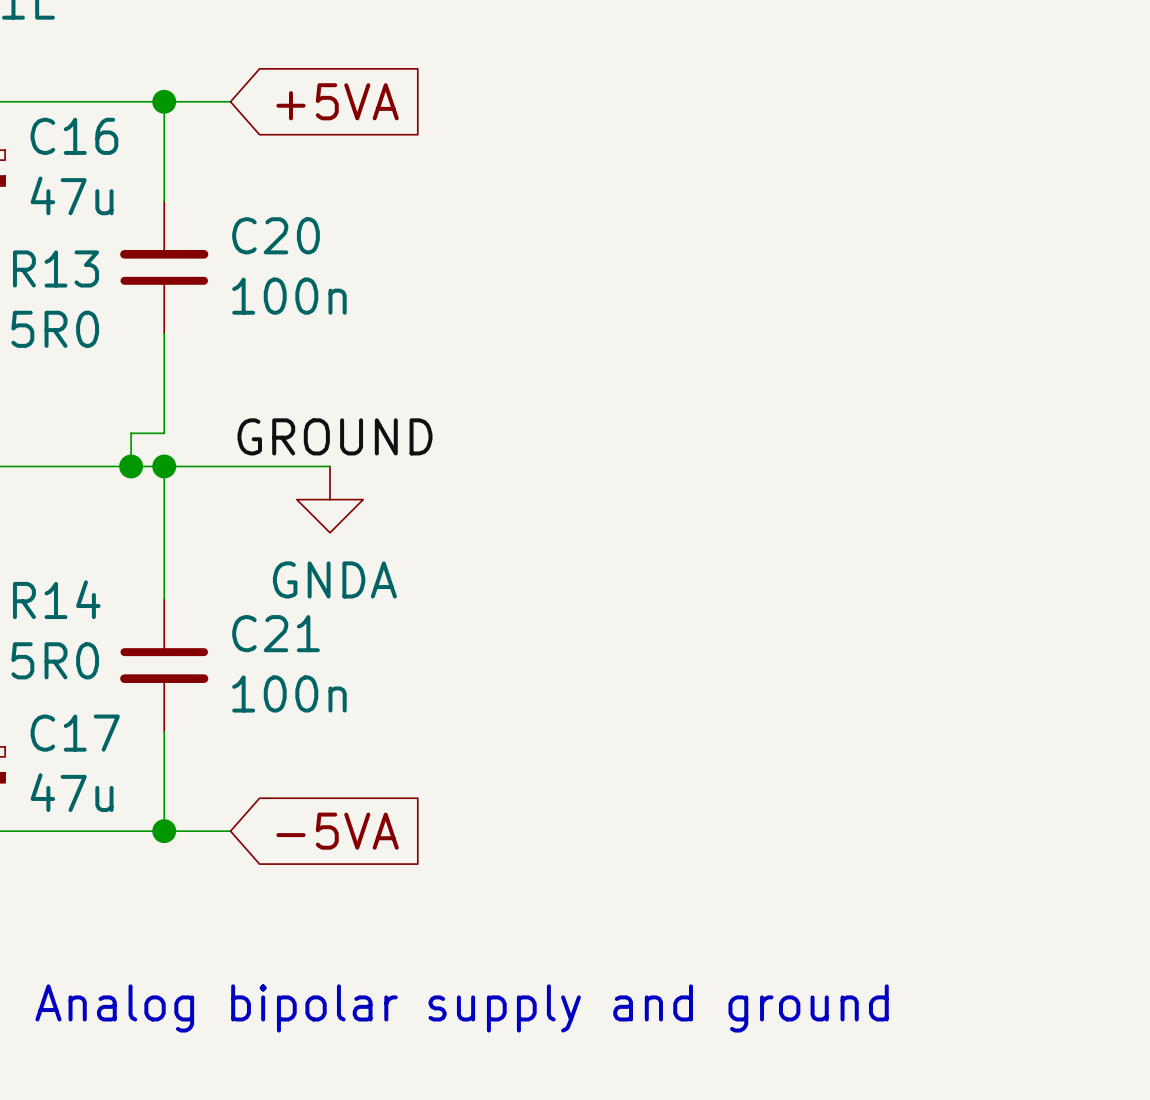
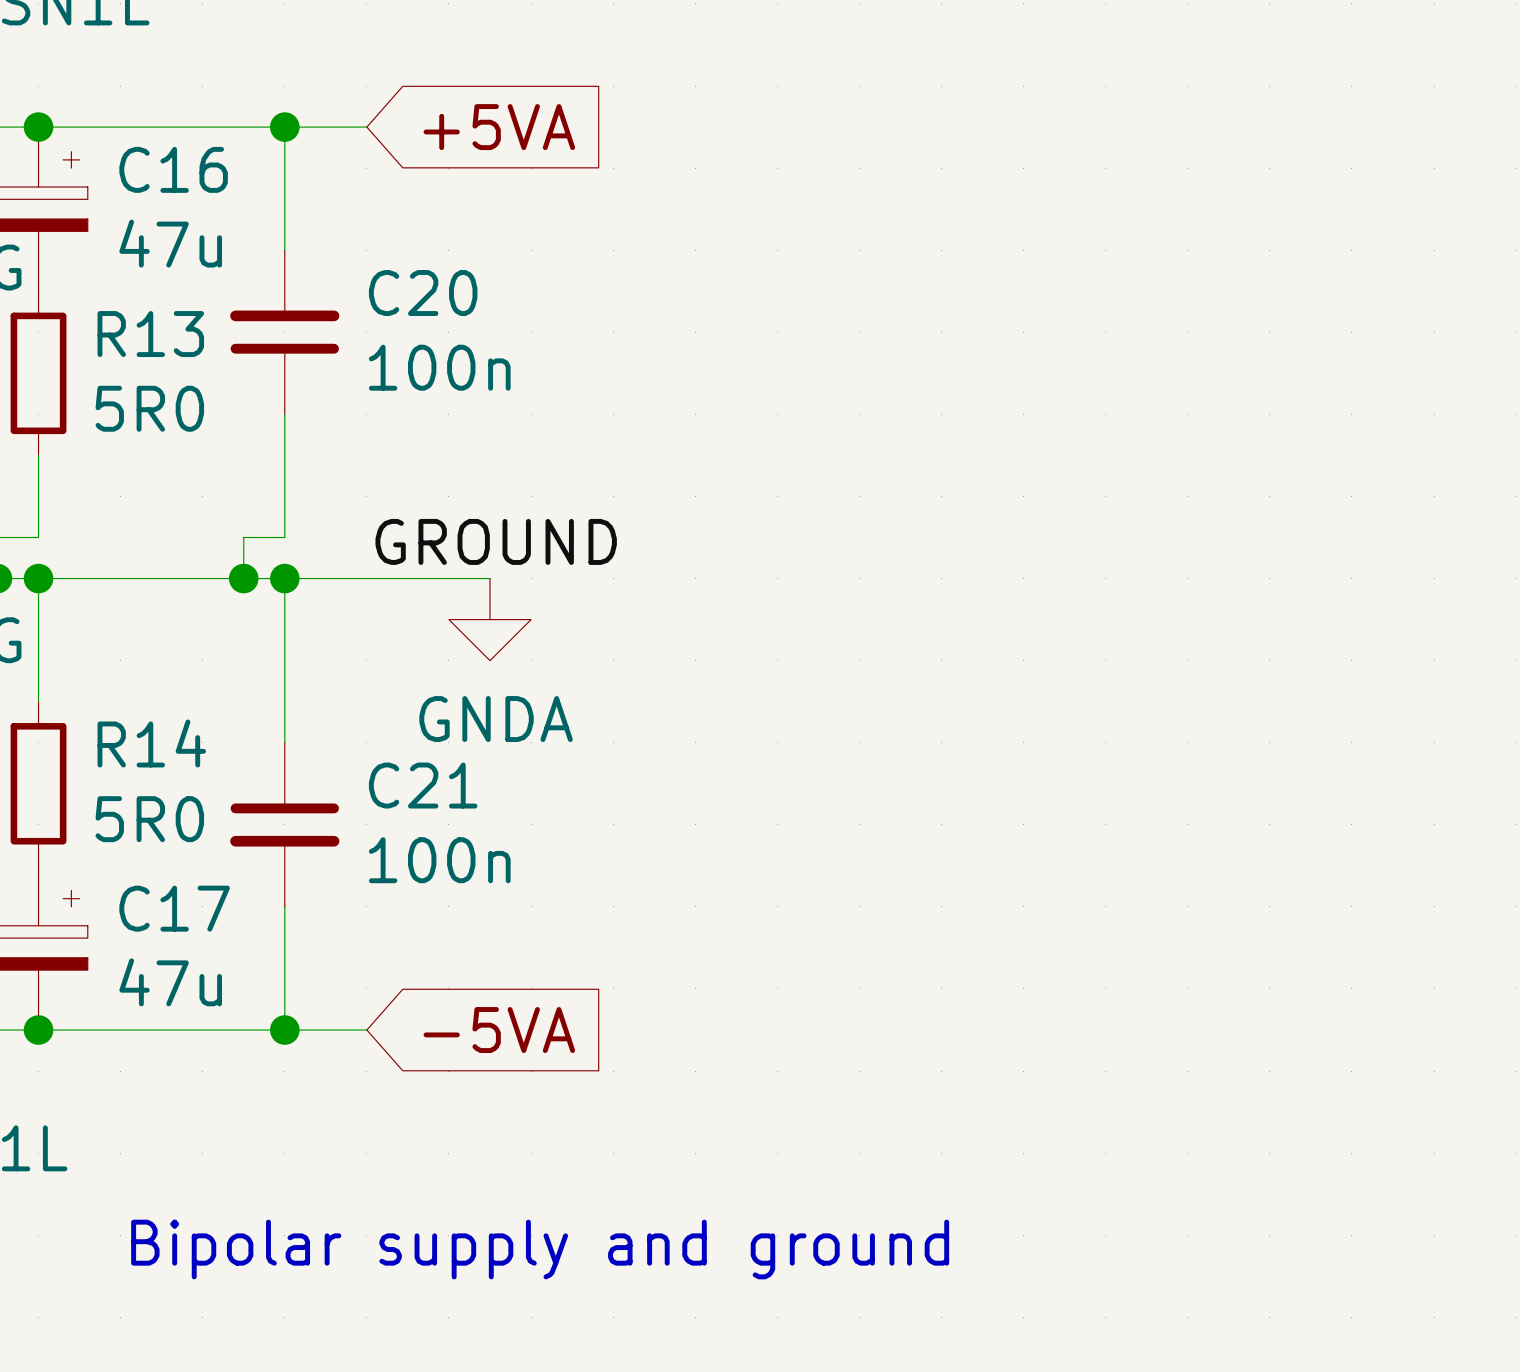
text: Analog bipolar supply and ground (462, 1008) -> Bipolar supply and ground (540, 1249)

